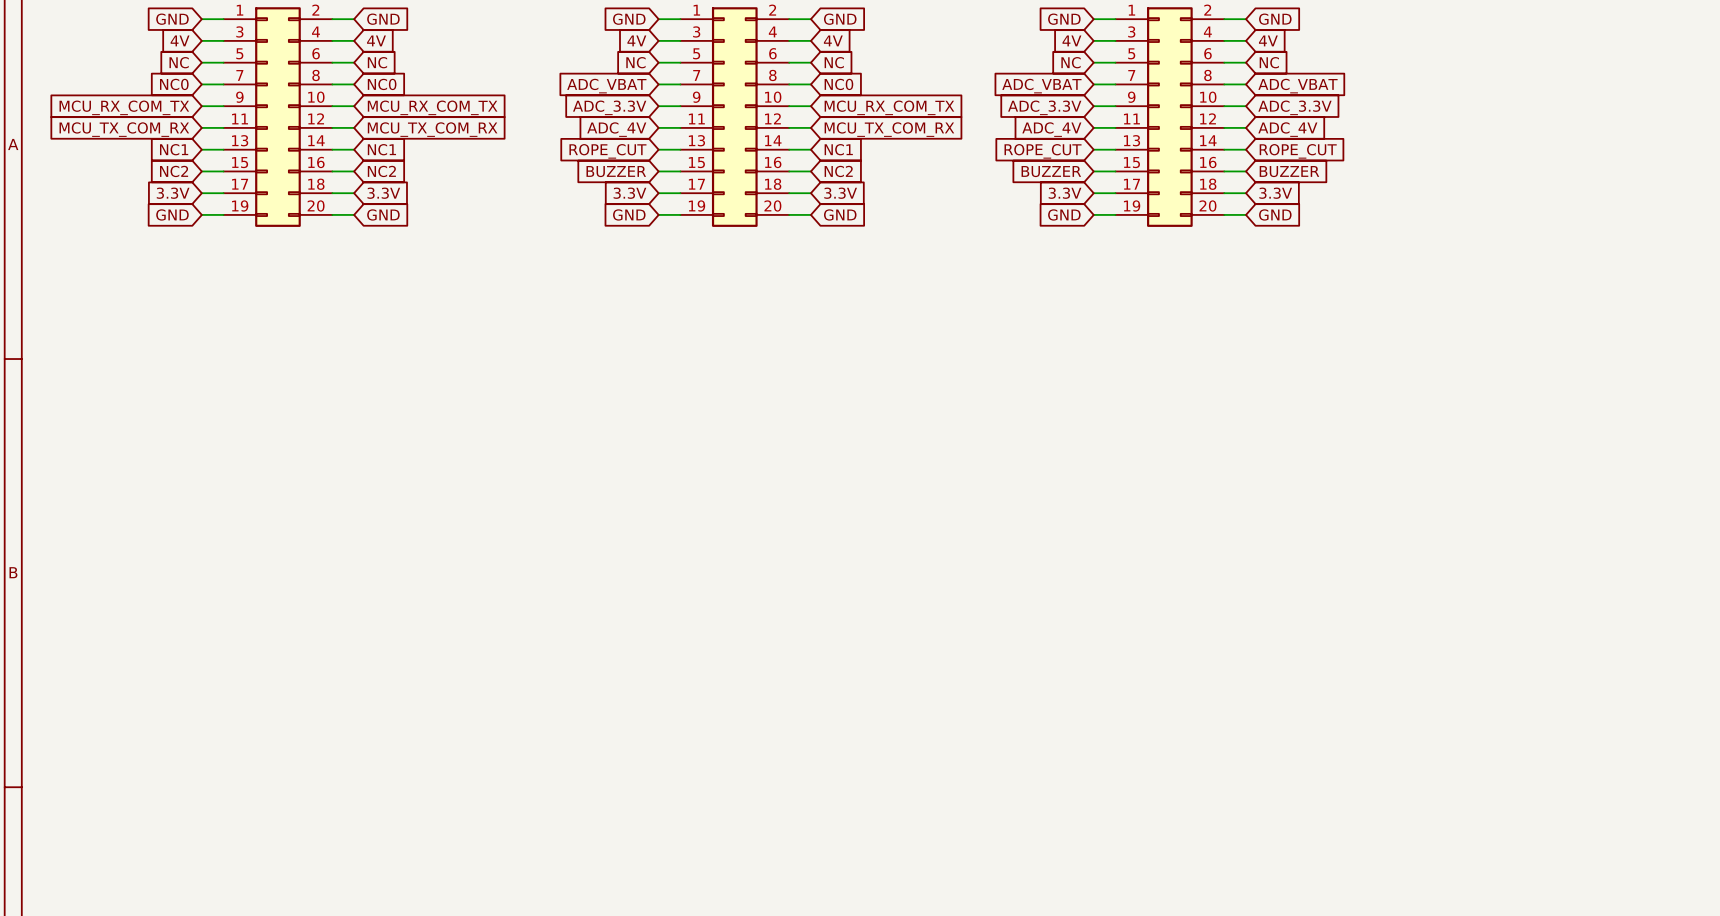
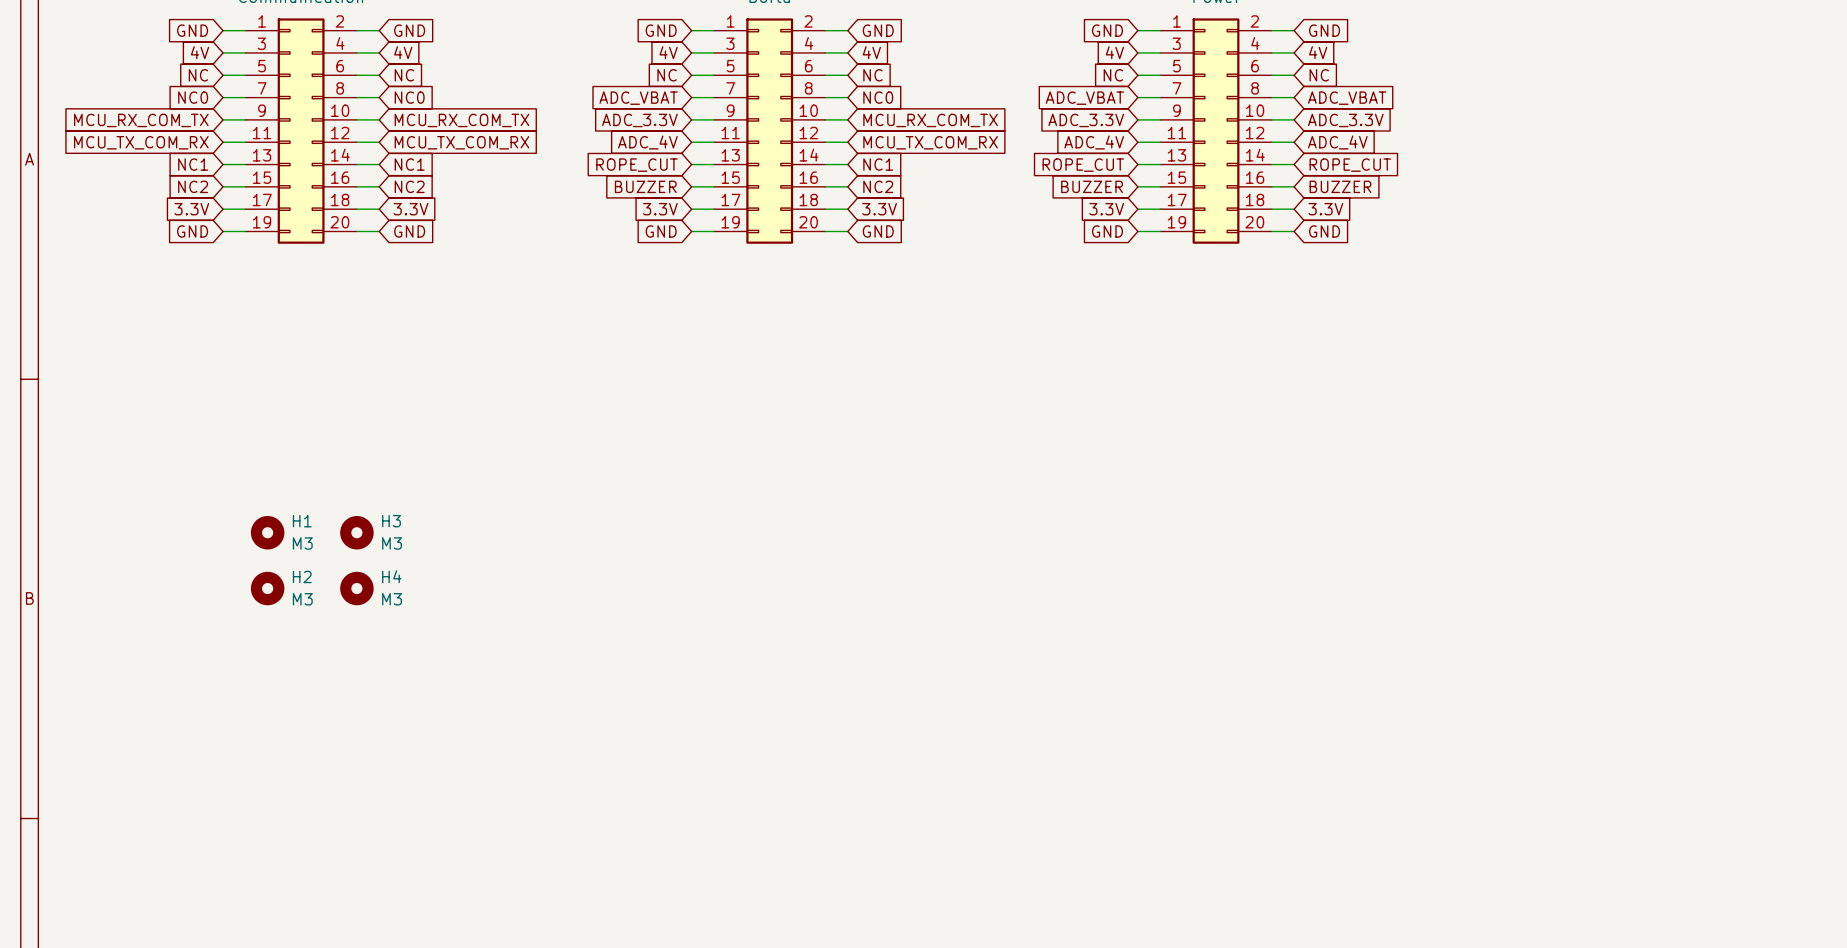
H1: none -> M3 (267, 532)
H3: none -> M3 (356, 532)
H2: none -> M3 (267, 588)
H4: none -> M3 (356, 588)

